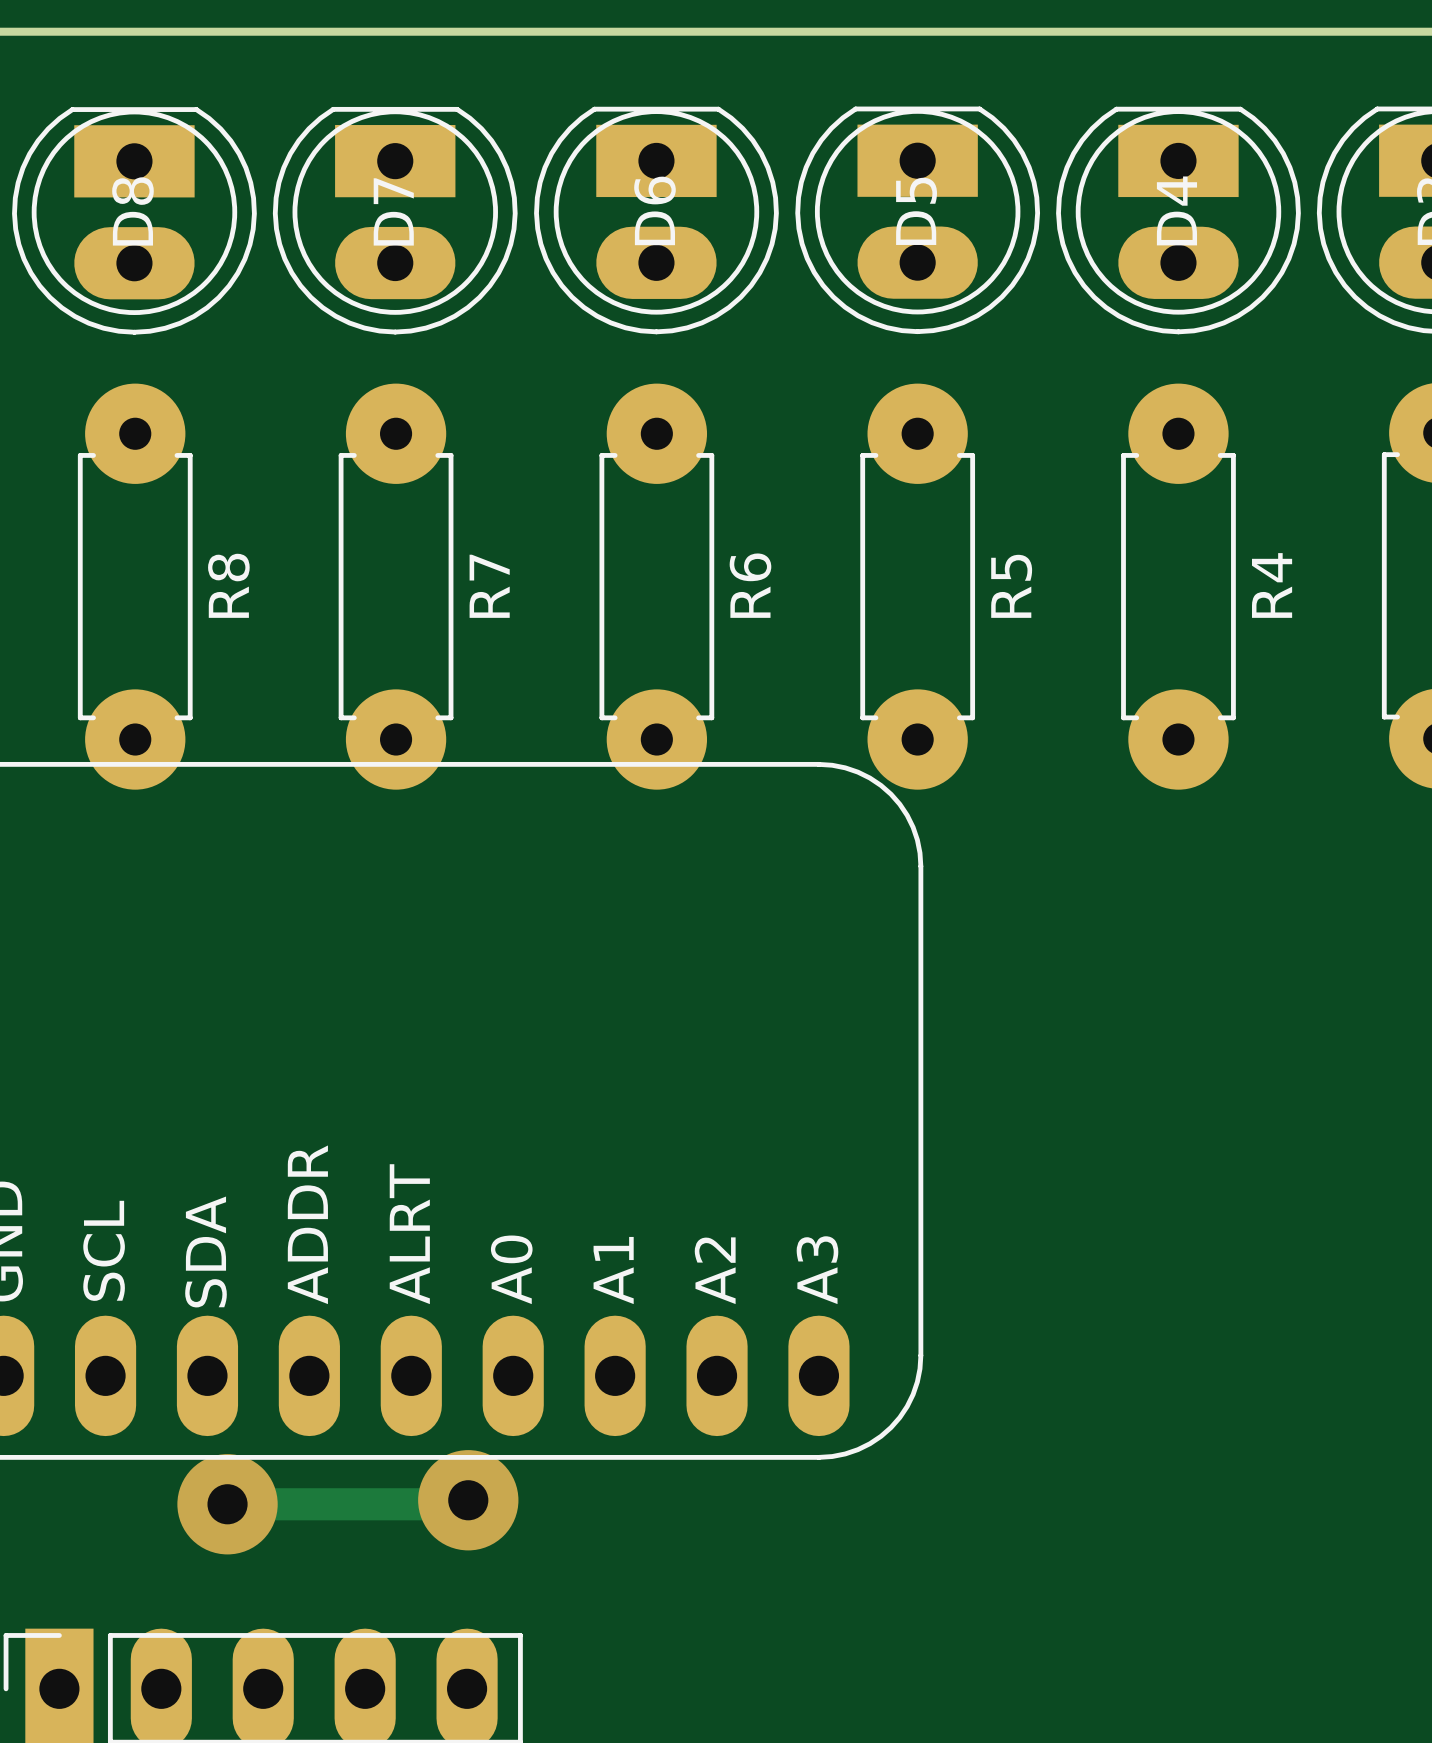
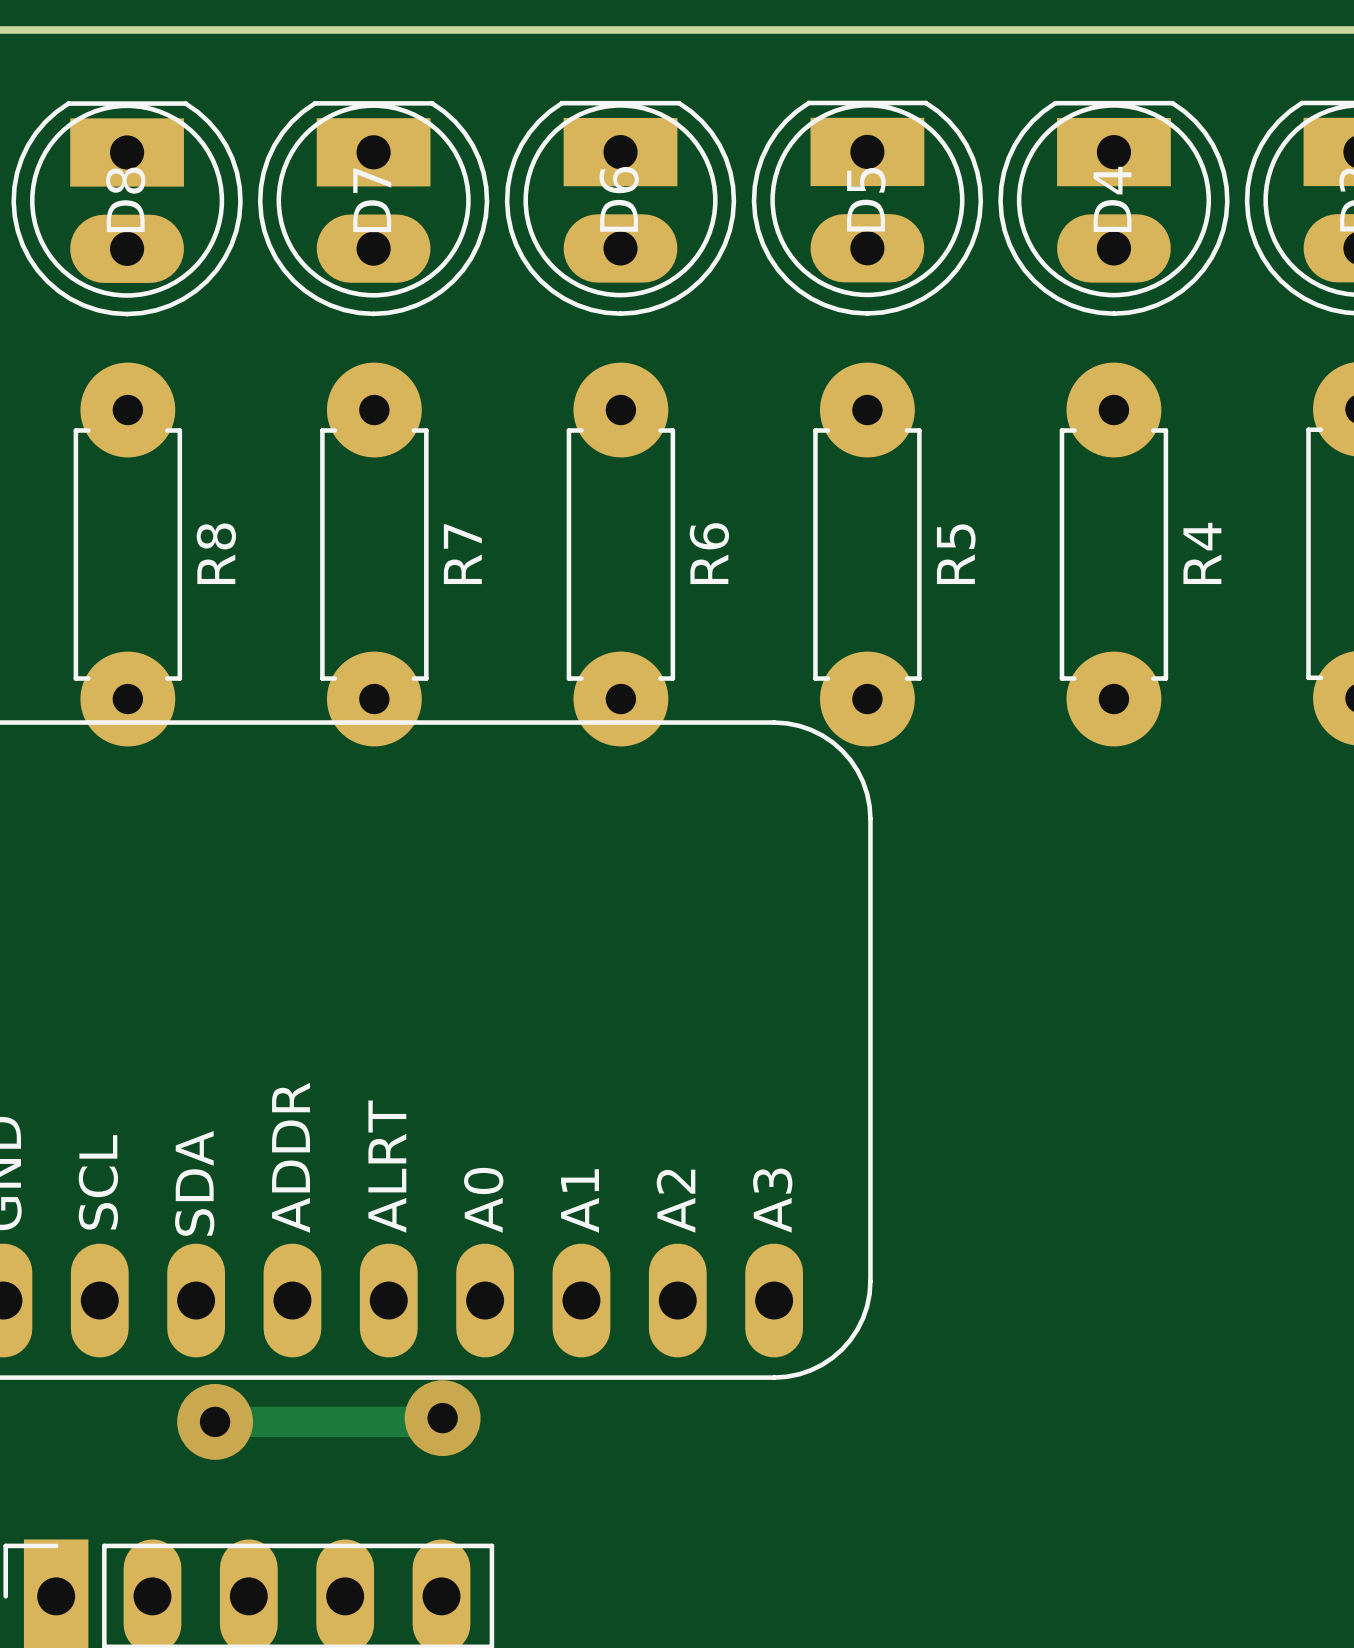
via size: [418, 1450, 519, 1551] -> [404, 1380, 481, 1457]
via size: [177, 1454, 278, 1555] -> [177, 1383, 254, 1460]

